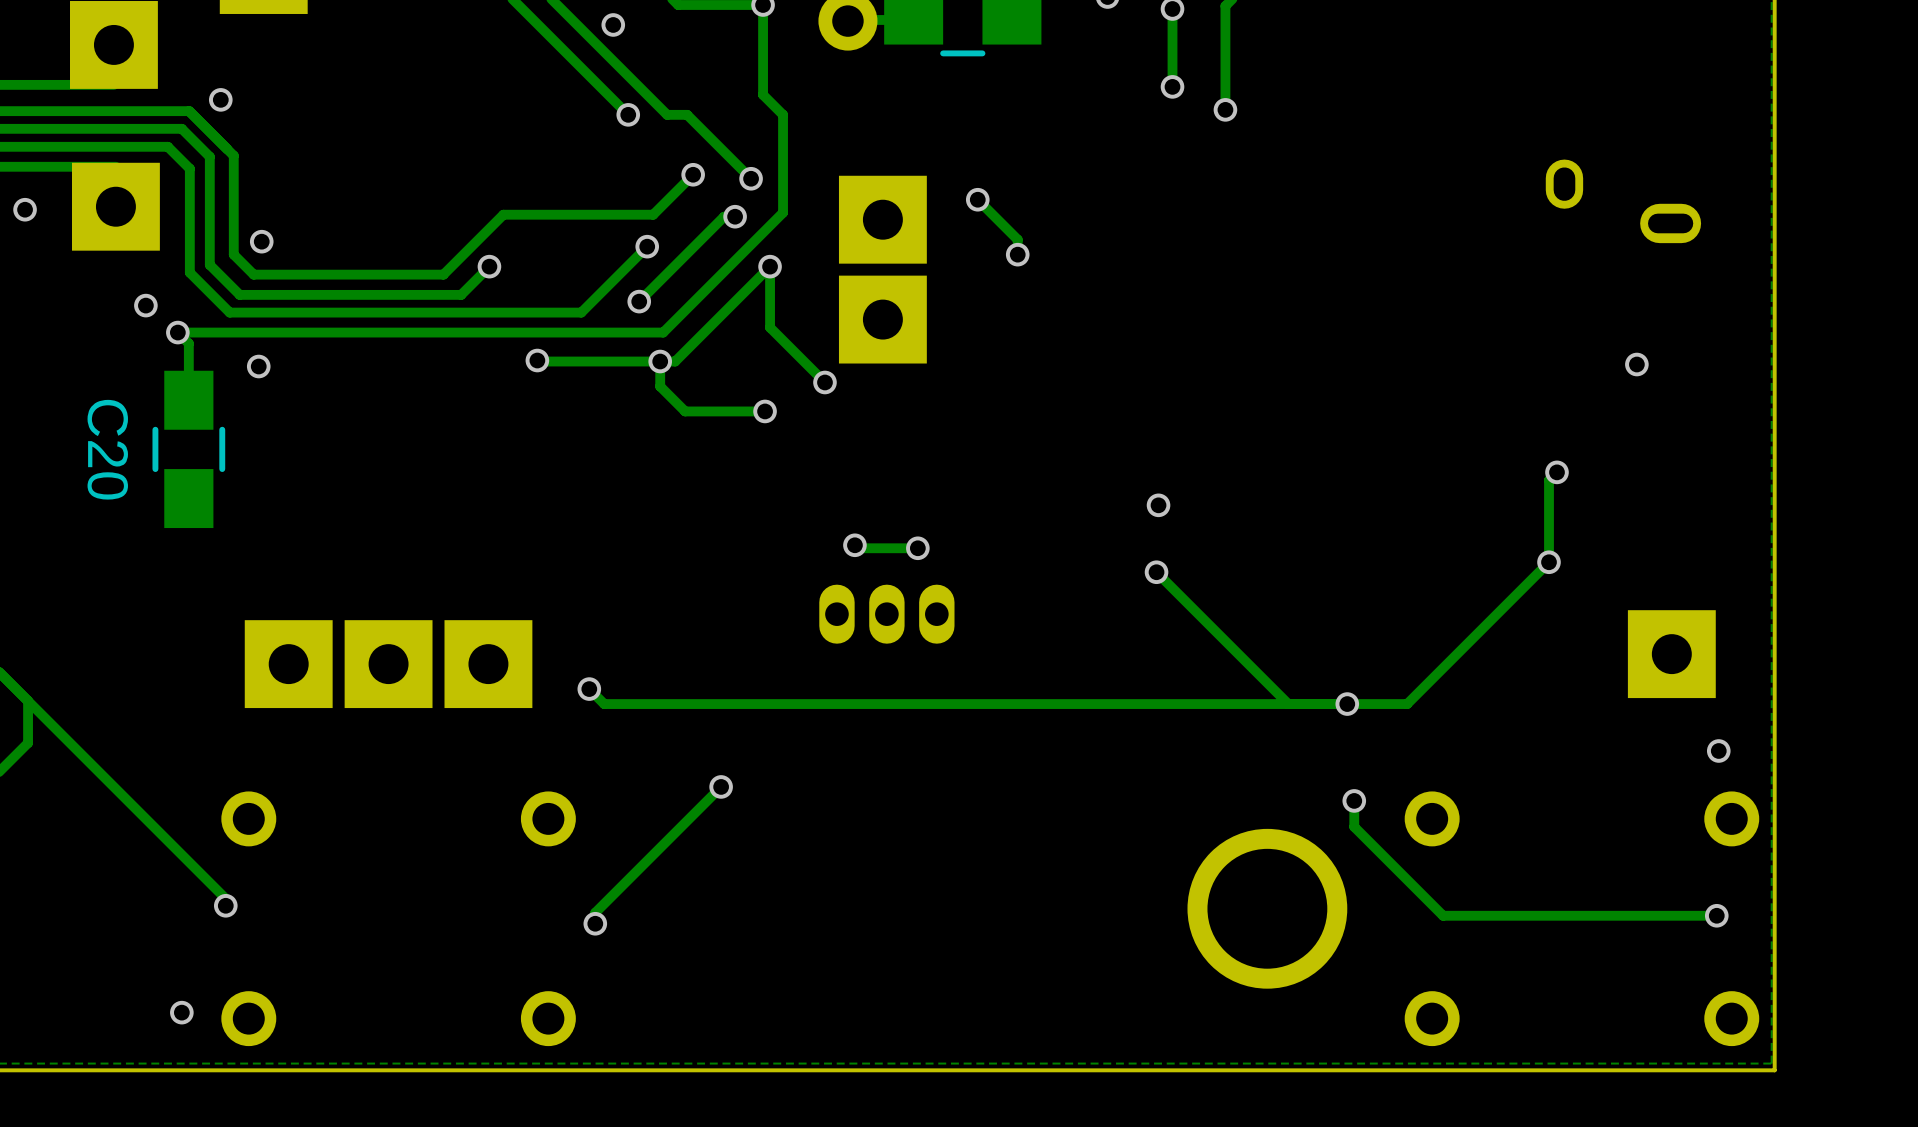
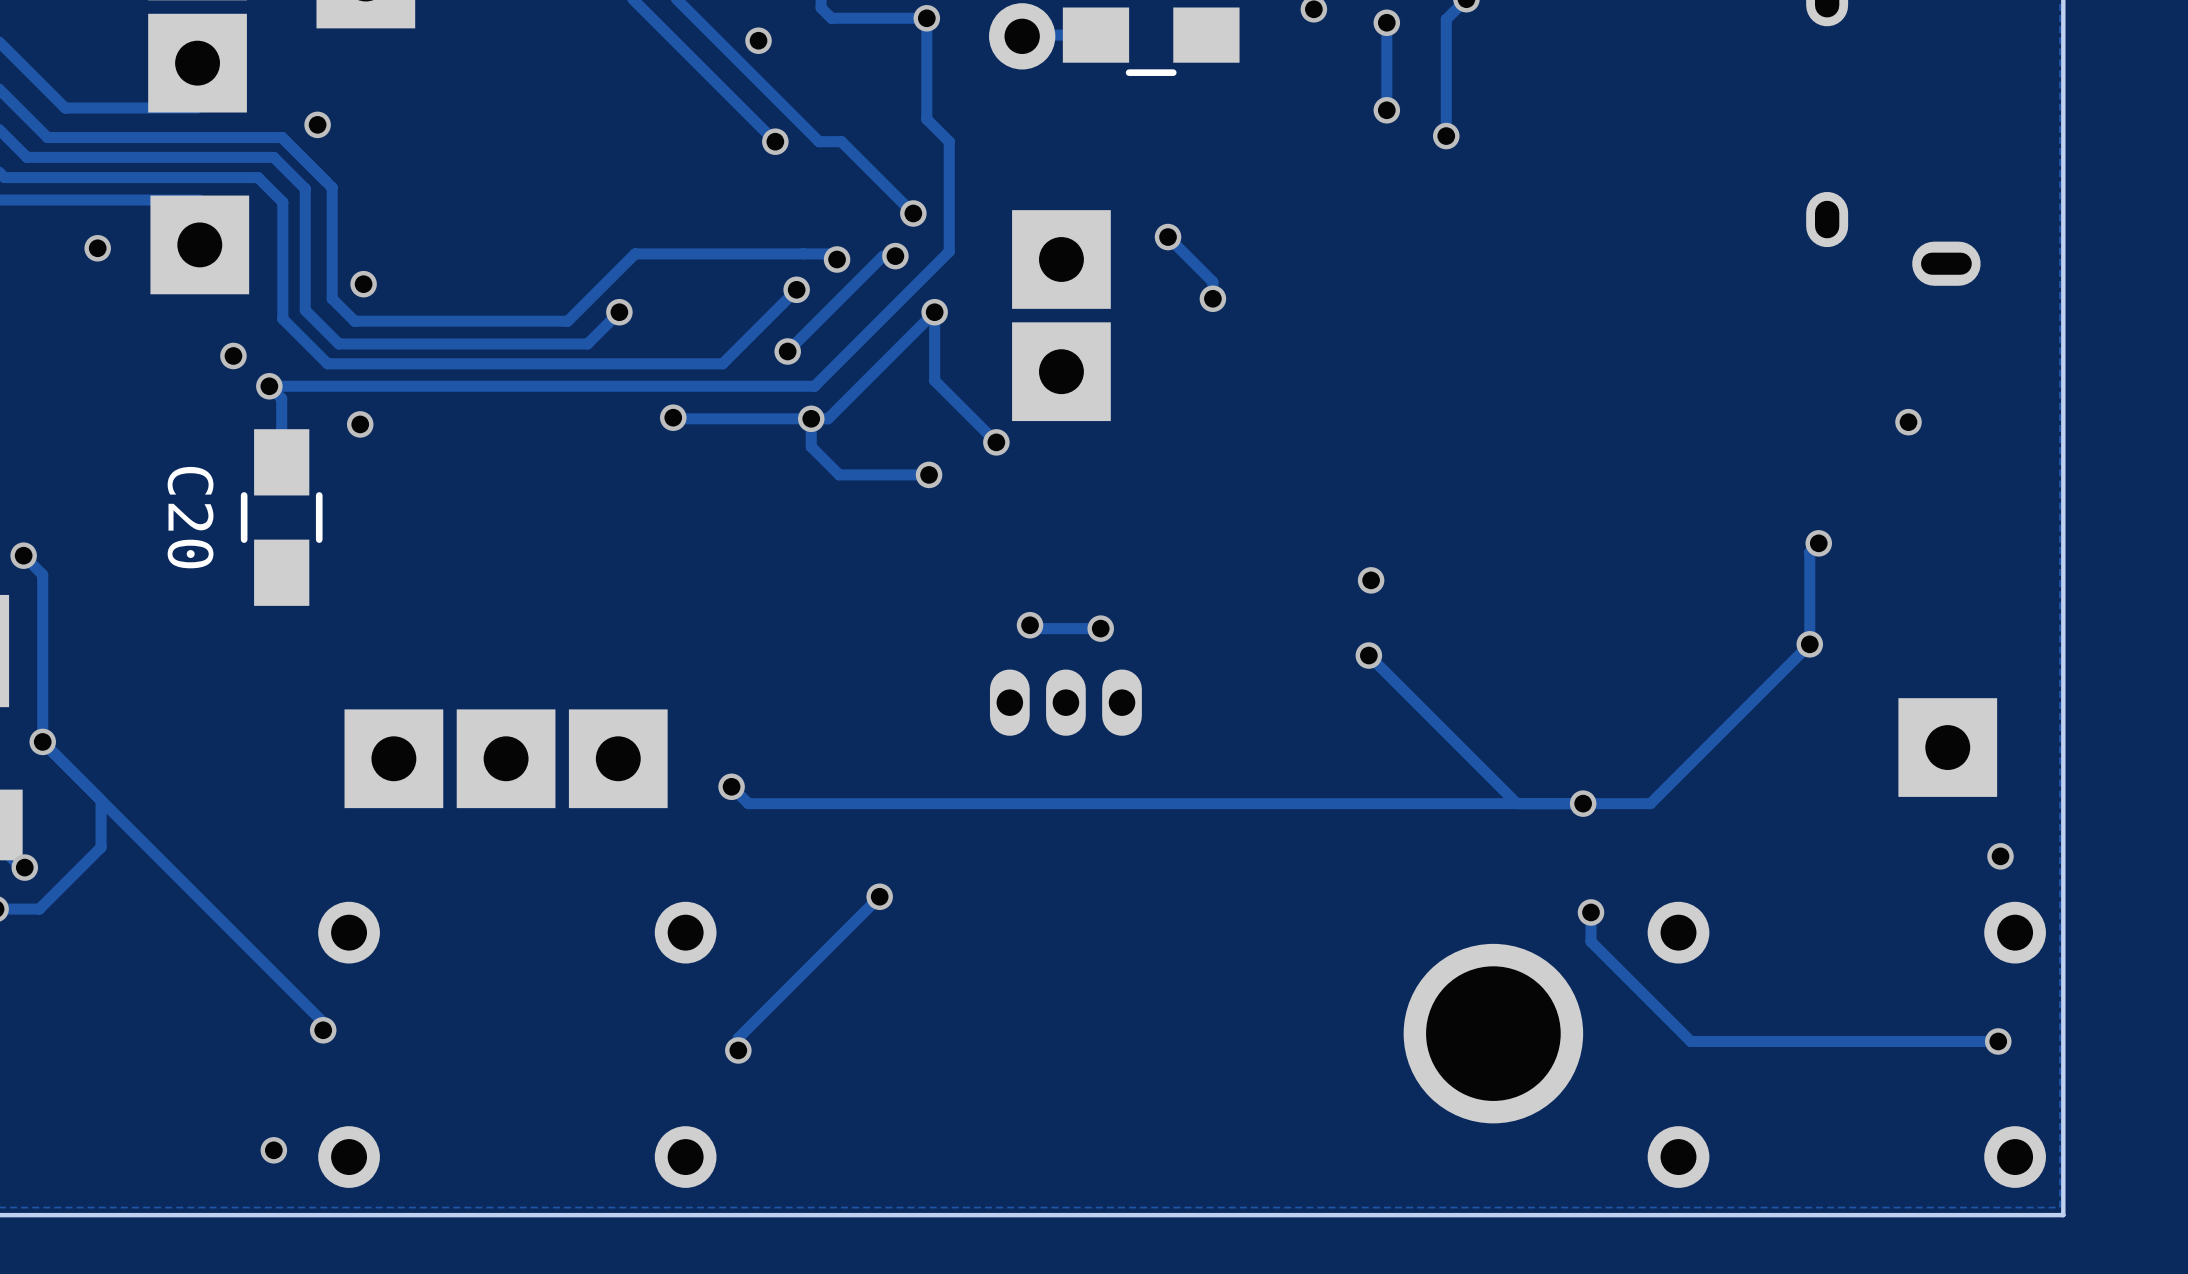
track: (693, 174) (653, 214) -> (837, 259) (831, 253) (803, 253)
via position: (693, 174) -> (837, 259)

